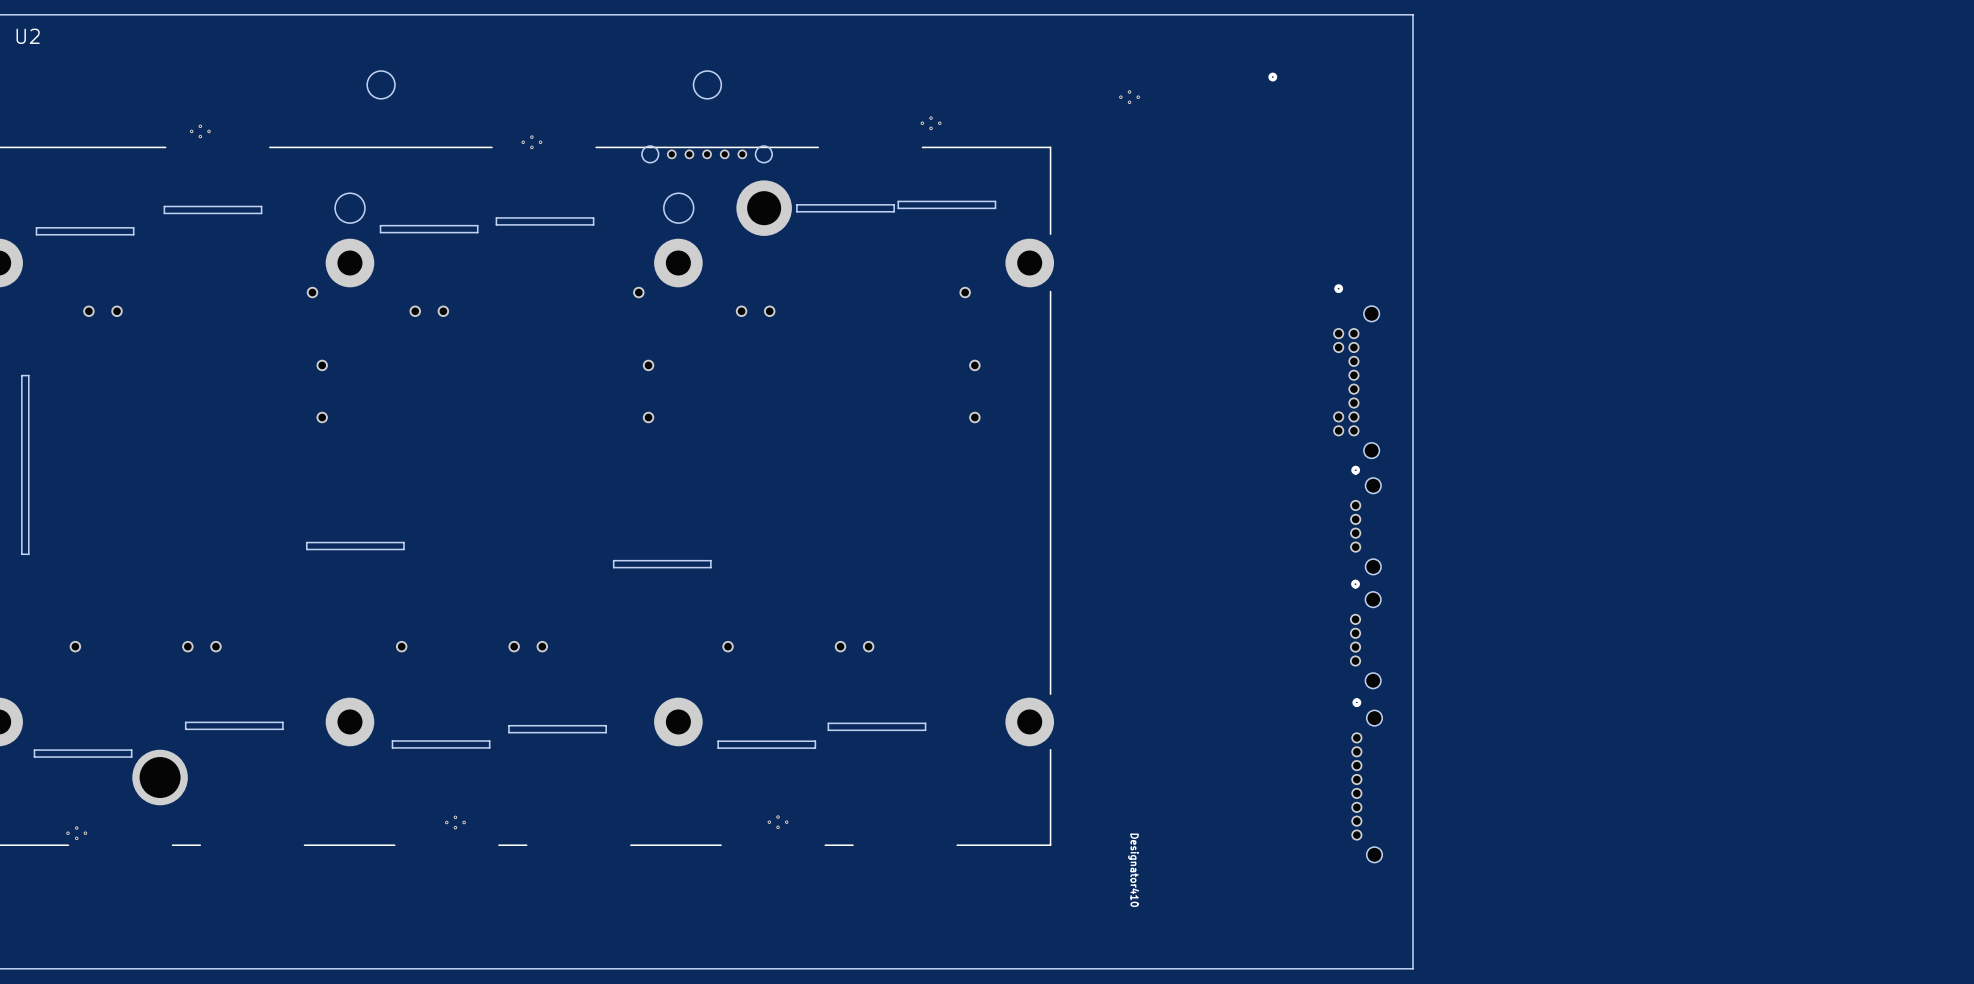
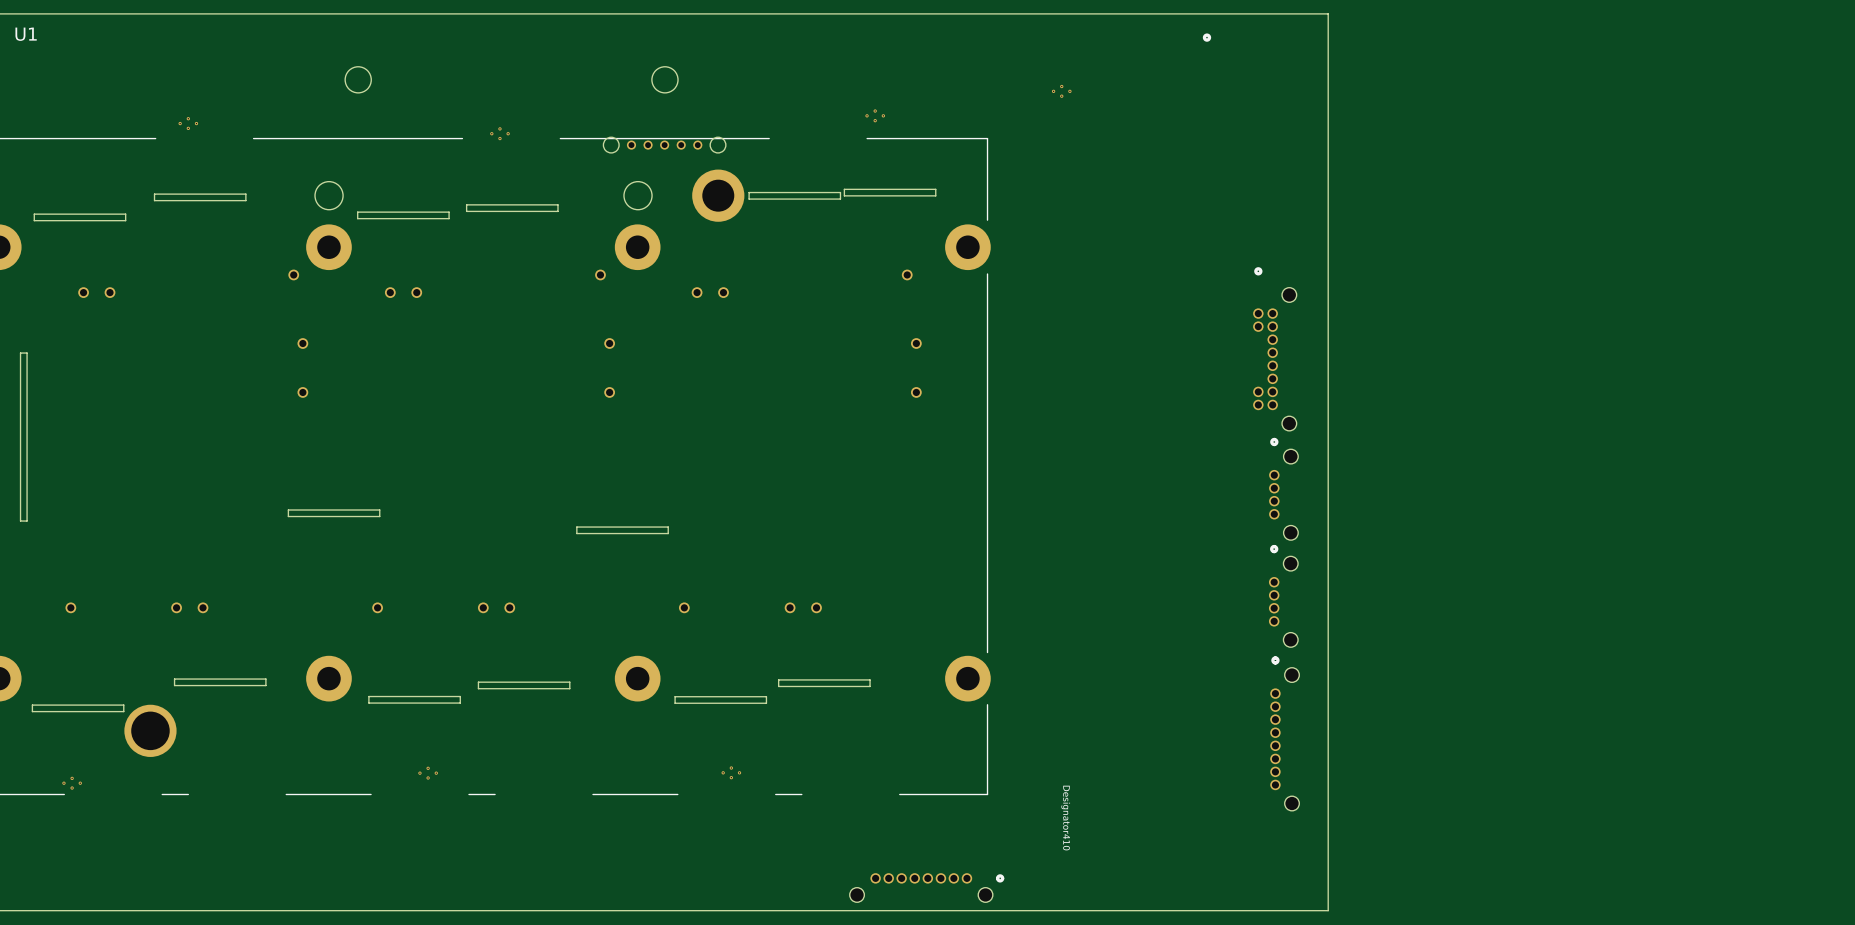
U2 name: U2 (28, 36) -> U1 (26, 34)
part position: (1272, 77) -> (1206, 37)
part: none -> (927, 887)

